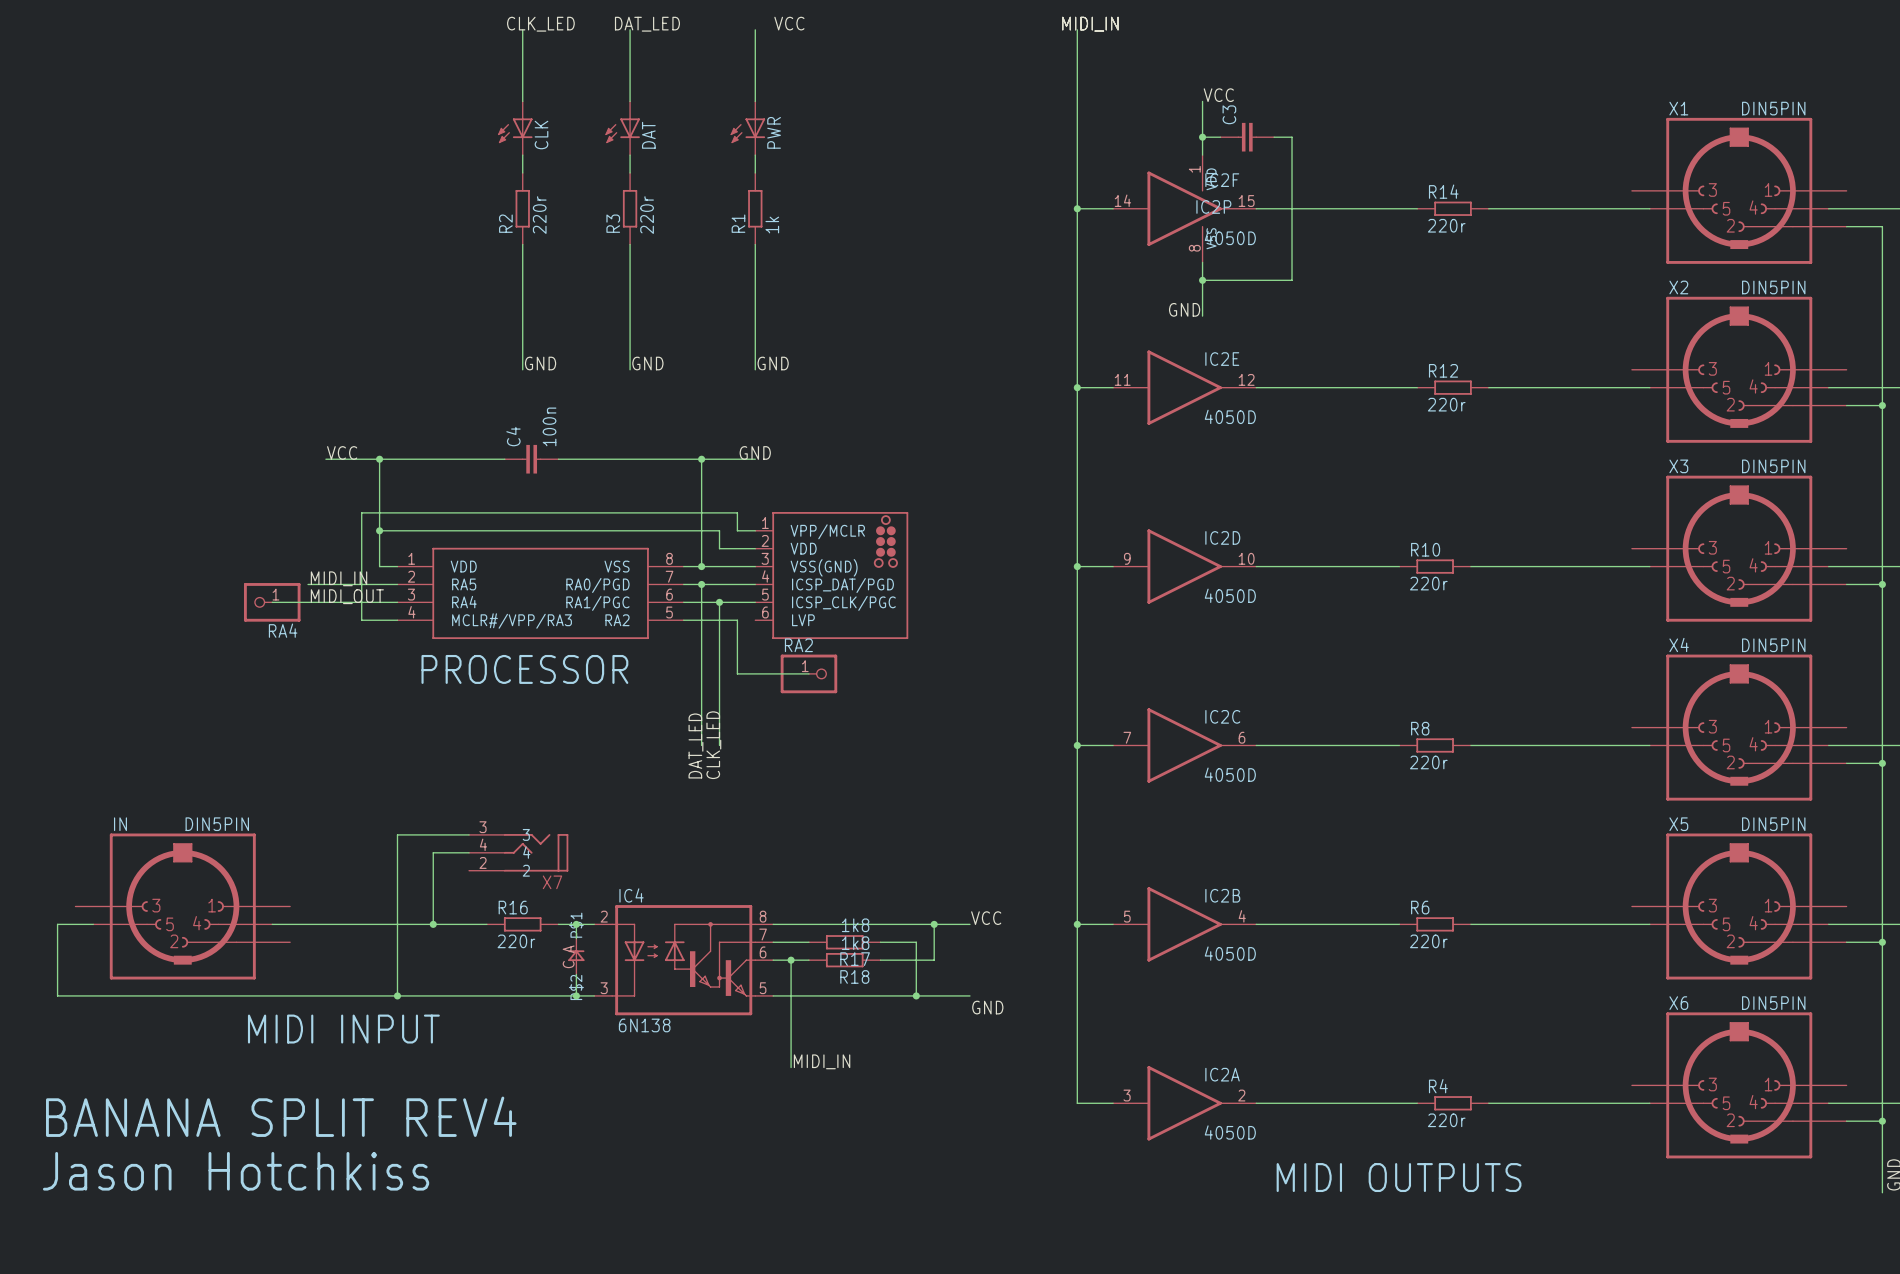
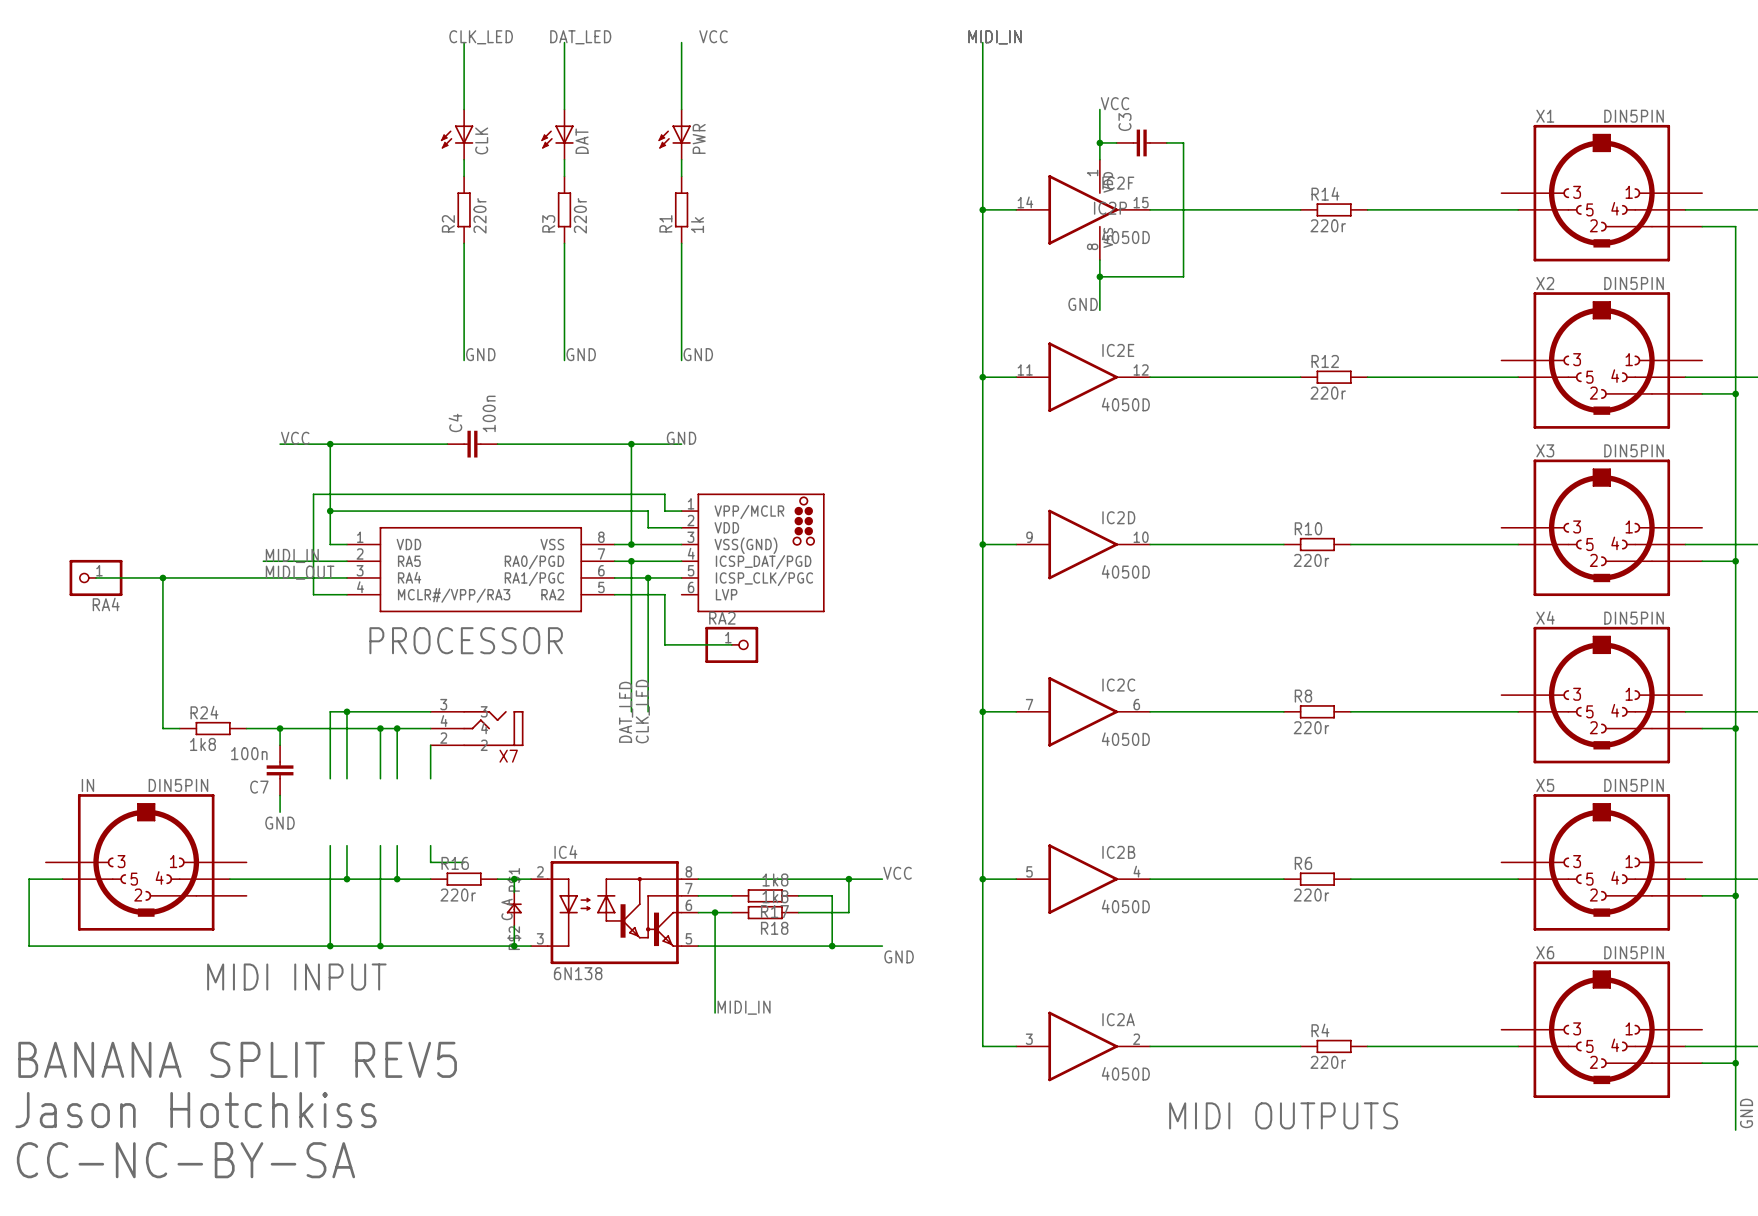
wire: none -> (96, 577) (229, 577)
wire: none -> (162, 577) (162, 728) (179, 728)
junction: none -> (162, 577)
RA4 position: (272, 602) -> (96, 577)
wire: none -> (346, 711) (346, 778)
junction: none -> (346, 711)
wire: none -> (430, 711) (330, 711) (330, 778)
R24: none -> 1k8 (213, 728)
wire: none -> (246, 728) (430, 728)
wire: none -> (280, 728) (280, 745)
junction: none -> (280, 728)
wire: none -> (380, 728) (380, 778)
junction: none -> (380, 728)
wire: none -> (397, 728) (397, 778)
junction: none -> (397, 728)
wire: none -> (430, 745) (430, 778)
C7: none -> 100n (280, 770)
wire: none -> (280, 795) (280, 812)
wire: (469, 834) (397, 834) (397, 888) -> none
wire: (469, 852) (433, 852) (433, 888) -> none
X7 position: (518, 852) -> (477, 728)
label: none -> GND (280, 823)
wire: none -> (330, 845) (330, 946)
wire: none -> (397, 845) (397, 879)
wire: none -> (430, 845) (430, 862) (464, 862)
wire: (397, 924) (397, 995) -> (380, 879) (380, 946)
junction: none -> (346, 879)
junction: (433, 924) -> none
junction: none -> (397, 879)
junction: none -> (330, 946)
junction: (397, 995) -> none
junction: none -> (380, 946)
text: BANANA SPLIT REV4 (281, 1116) -> BANANA SPLIT REV5 (237, 1059)
text: none -> CC-NC-BY-SA (185, 1160)

